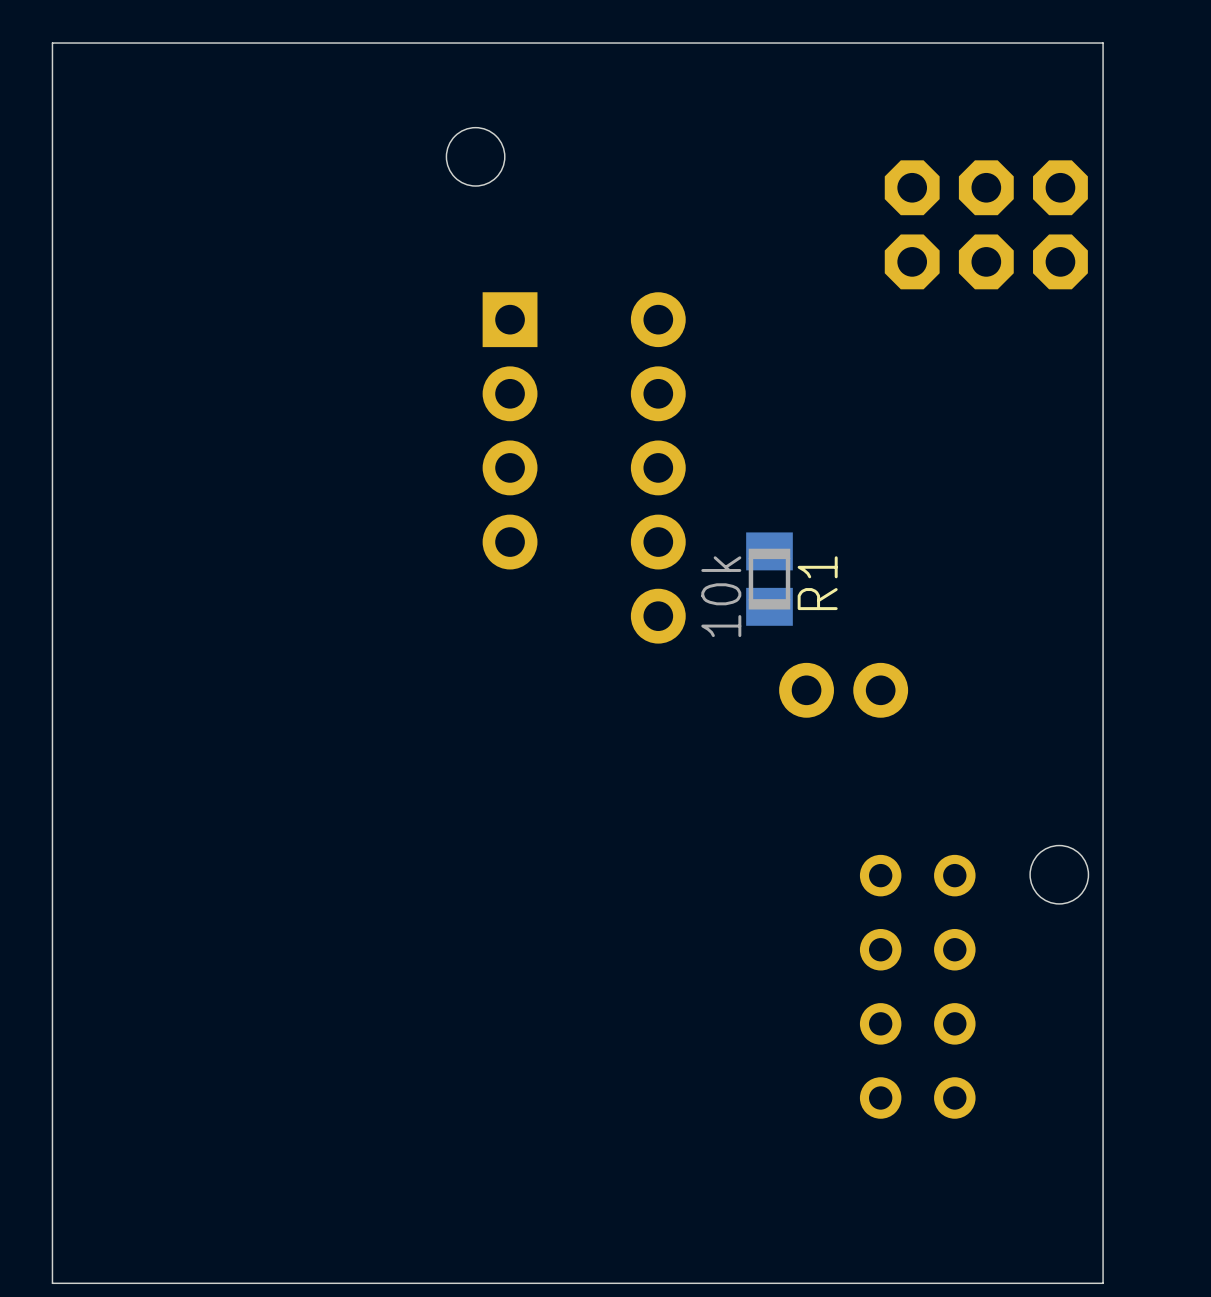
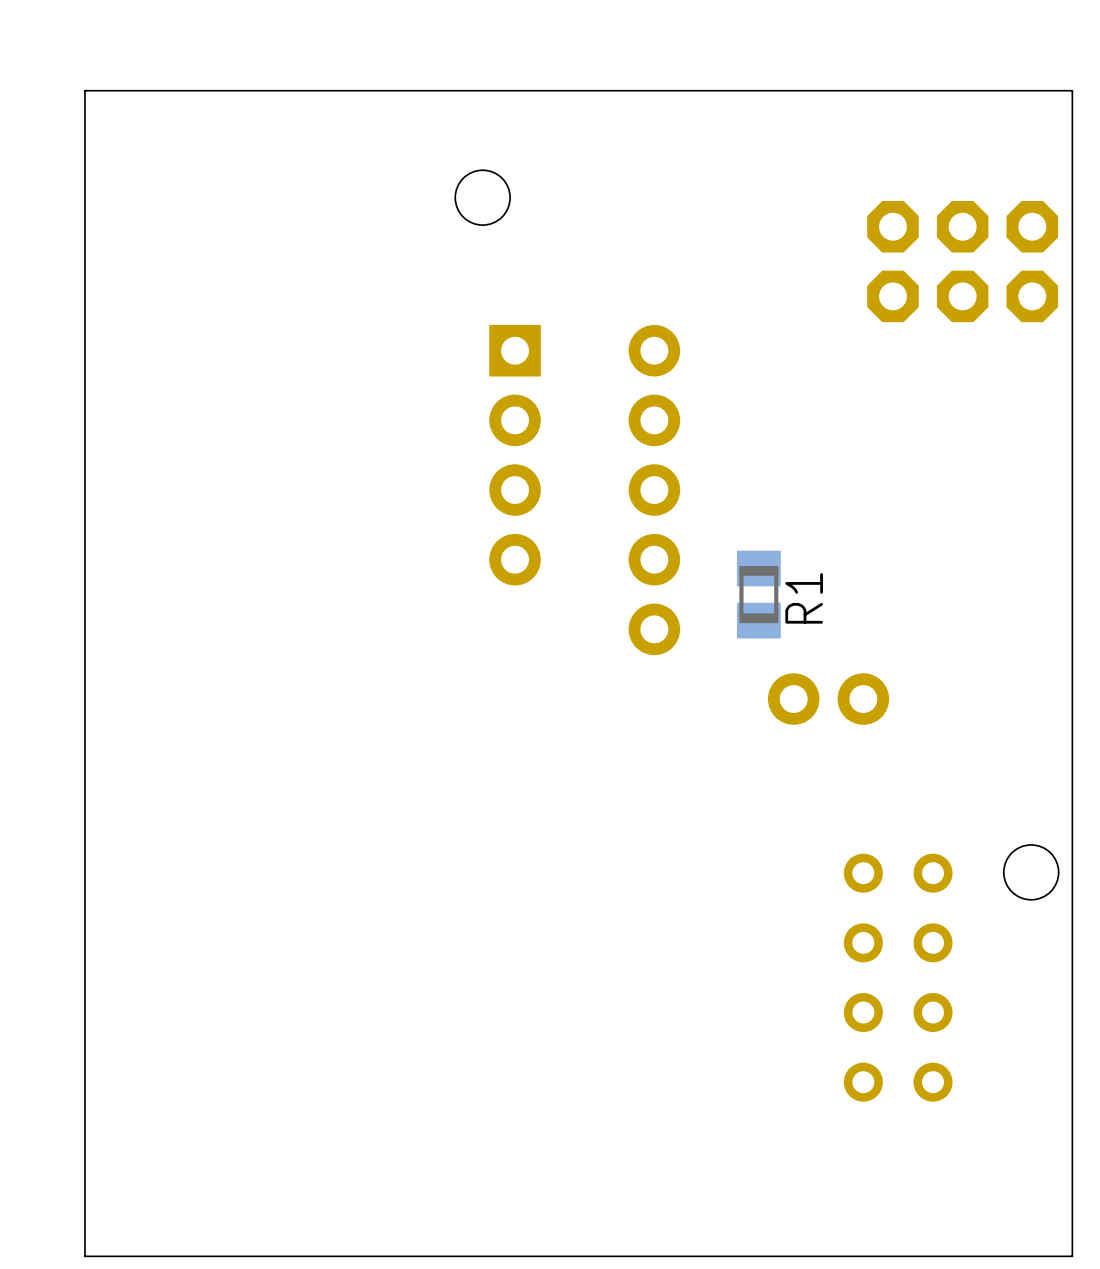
R1 value: 10k (721, 596) -> none

